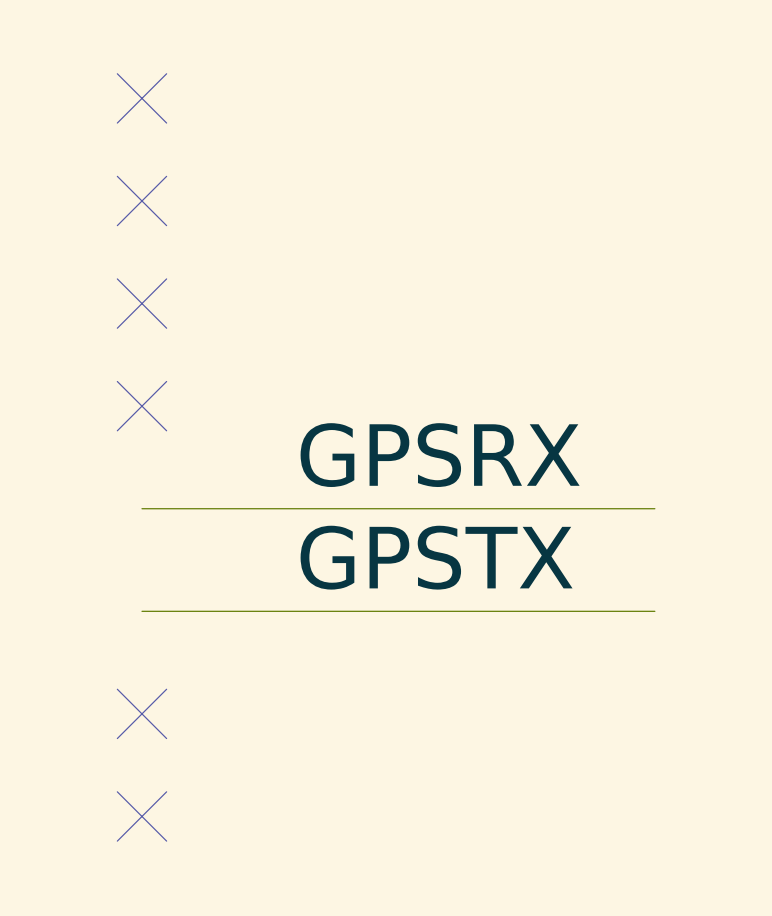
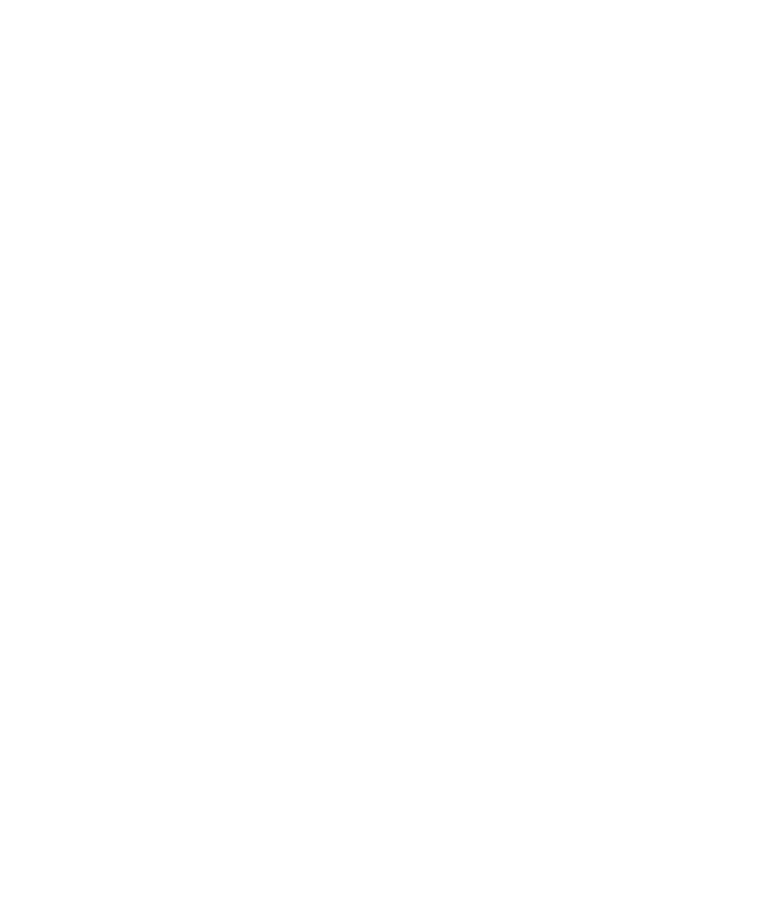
no-connect mark: (141, 98) -> none
no-connect mark: (141, 200) -> none
no-connect mark: (141, 303) -> none
no-connect mark: (141, 406) -> none
label: GPSRX (440, 455) -> none
wire: (141, 508) (654, 508) -> none
label: GPSTX (436, 557) -> none
wire: (141, 611) (654, 611) -> none
no-connect mark: (141, 713) -> none
no-connect mark: (141, 816) -> none

